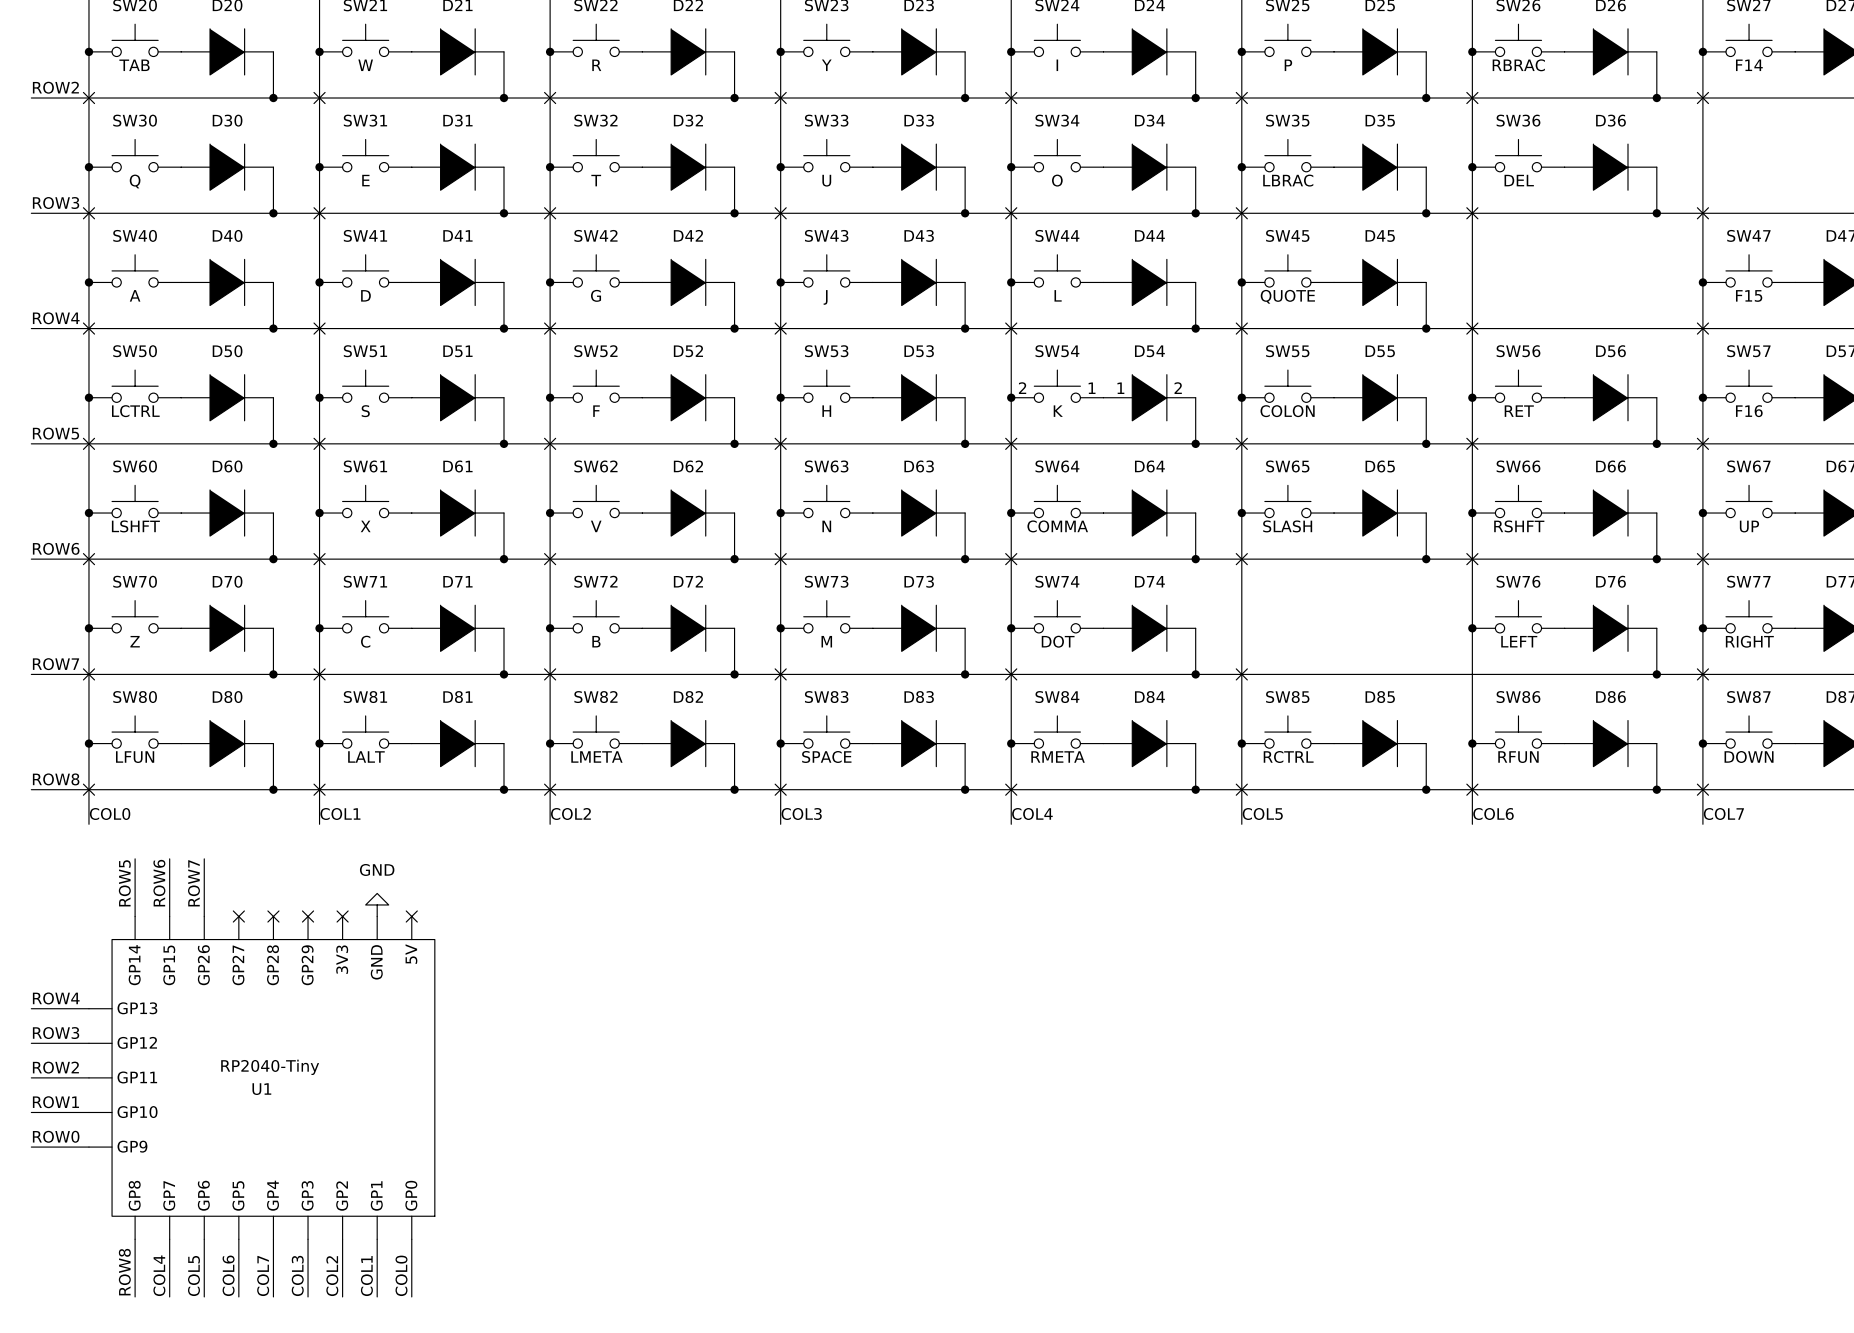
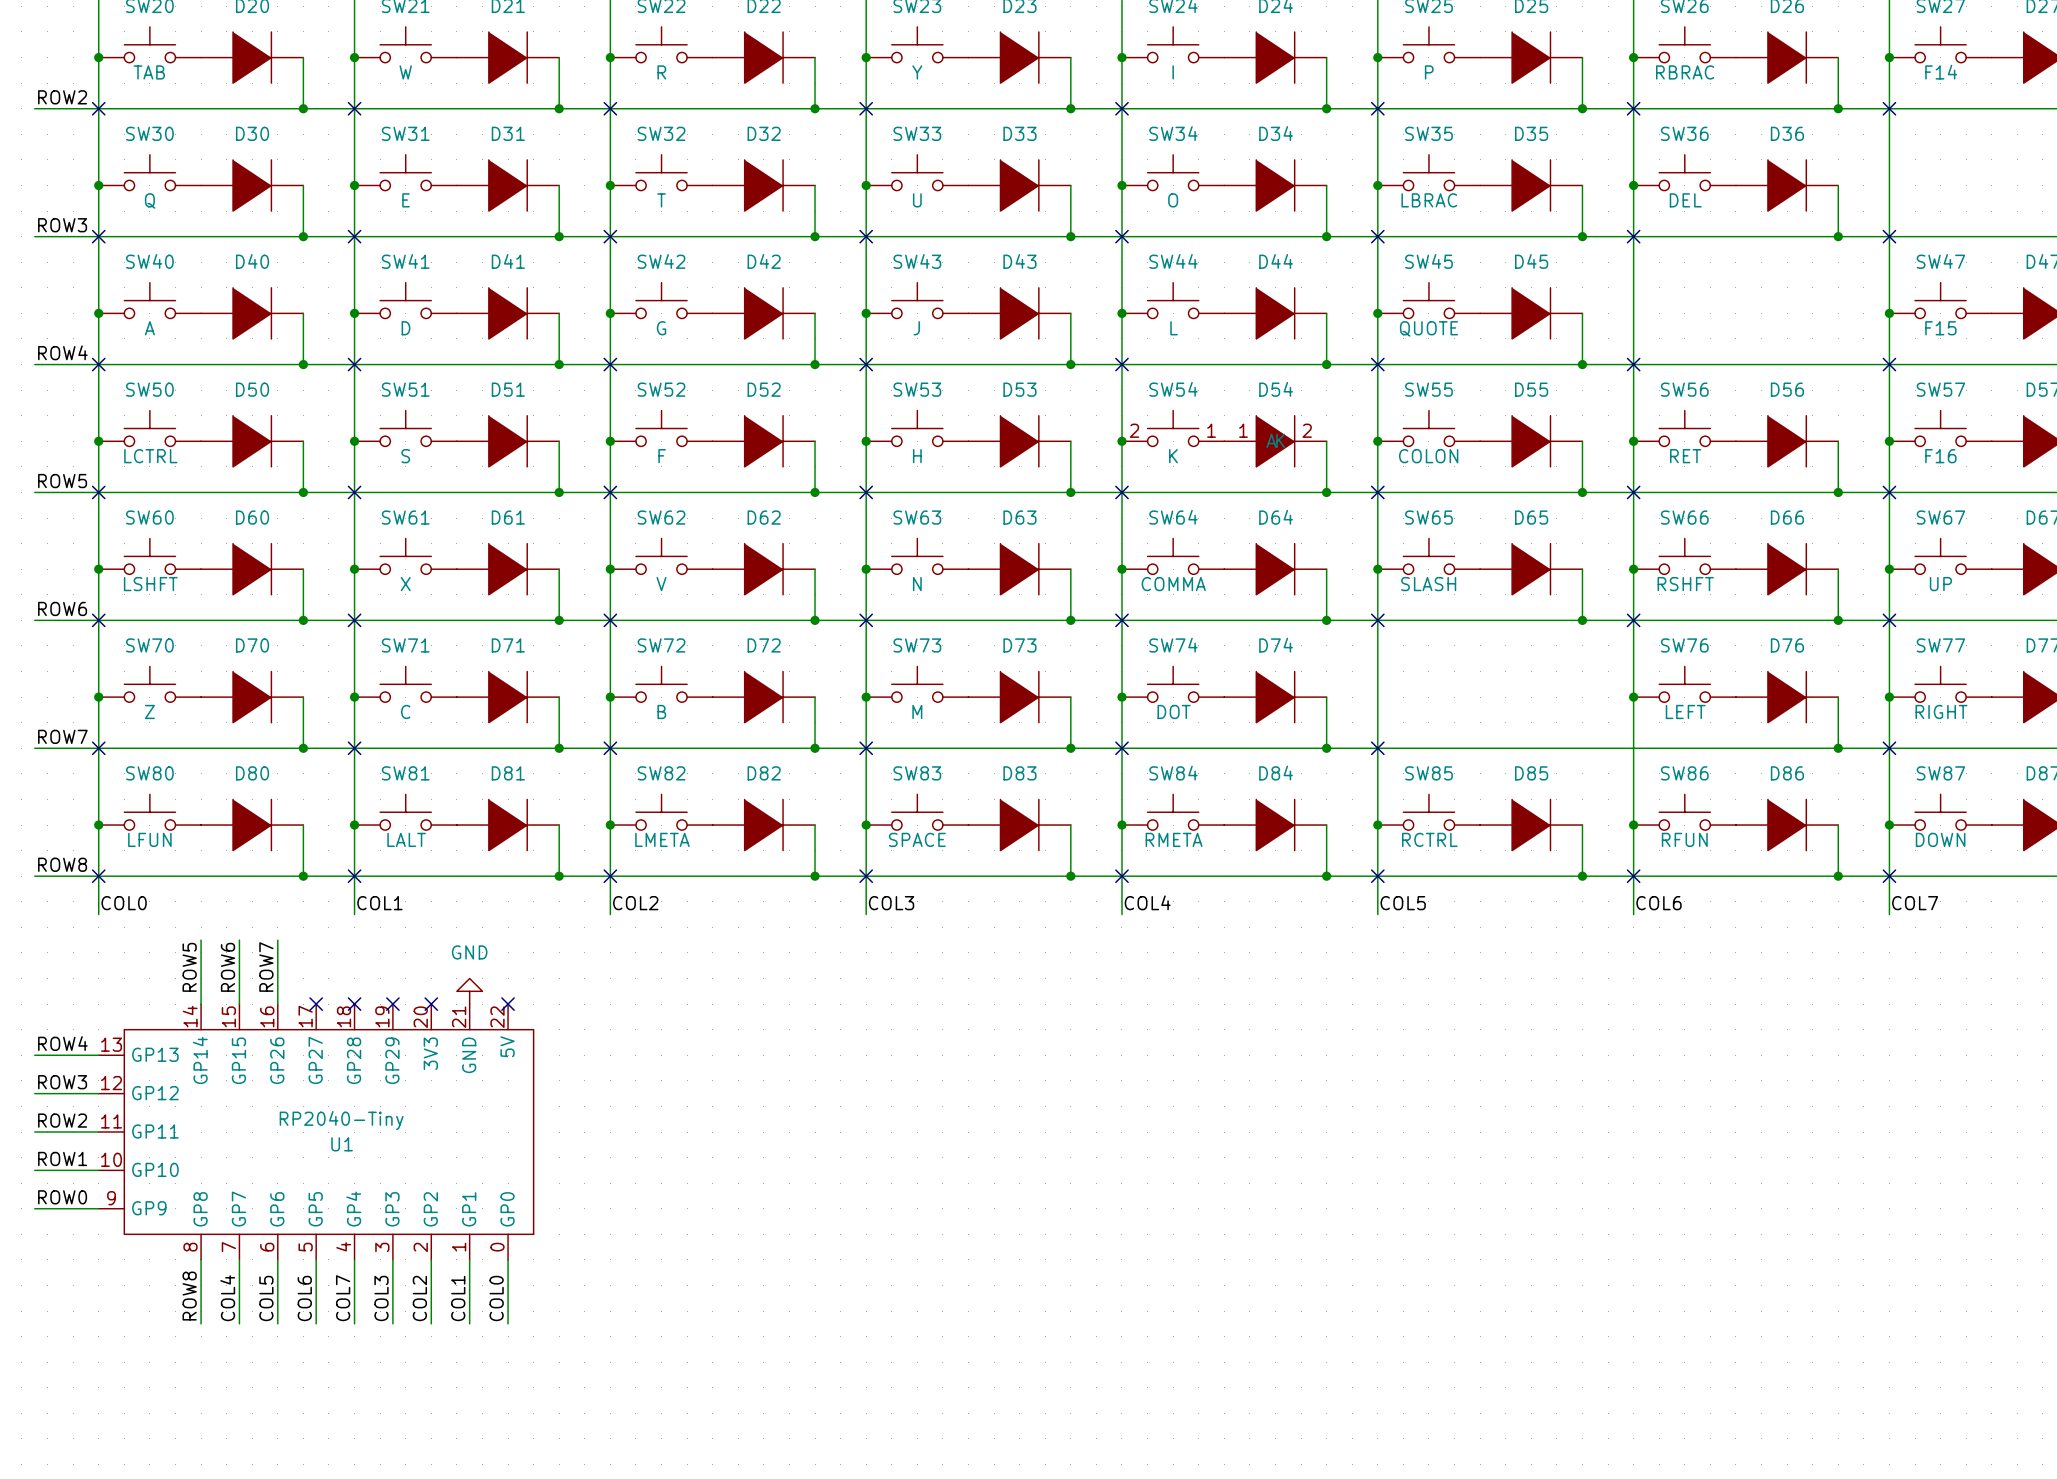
wire: (135, 858) (135, 916) -> (201, 940) (201, 1004)
wire: (169, 858) (169, 916) -> (239, 940) (239, 1004)
wire: (204, 858) (204, 916) -> (277, 940) (277, 1004)
label position: ROW5 (124, 883) -> ROW5 (189, 967)
label position: ROW6 (159, 883) -> ROW6 (228, 967)
label position: ROW7 (193, 883) -> ROW7 (266, 967)
no-connect mark: none -> (316, 1004)
no-connect mark: none -> (354, 1004)
no-connect mark: none -> (392, 1004)
power symbol position: GND (377, 904) -> GND (469, 991)
no-connect mark: none -> (431, 1004)
no-connect mark: none -> (508, 1004)
U1 symbol: [88, 916, 435, 1240] -> [98, 1004, 534, 1260]
no-connect mark: (238, 916) -> none
no-connect mark: (273, 916) -> none
no-connect mark: (308, 916) -> none
no-connect mark: (342, 916) -> none
no-connect mark: (411, 916) -> none
label position: ROW4 (56, 998) -> ROW4 (62, 1043)
wire: (31, 1008) (88, 1008) -> (34, 1055) (98, 1055)
label position: ROW3 (56, 1033) -> ROW3 (62, 1082)
wire: (31, 1043) (88, 1043) -> (34, 1093) (98, 1093)
label position: ROW2 (55, 1067) -> ROW2 (62, 1120)
U1 value position: RP2040-Tiny (270, 1067) -> RP2040-Tiny (341, 1120)
wire: (31, 1077) (88, 1077) -> (34, 1132) (98, 1132)
U1 name position: U1 (261, 1089) -> U1 (342, 1144)
label position: ROW1 (55, 1102) -> ROW1 (62, 1158)
wire: (31, 1112) (88, 1112) -> (34, 1170) (98, 1170)
label position: ROW0 (56, 1136) -> ROW0 (62, 1197)
wire: (31, 1147) (88, 1147) -> (34, 1208) (98, 1208)
wire: (135, 1239) (135, 1296) -> (201, 1259) (201, 1323)
wire: (169, 1239) (169, 1296) -> (239, 1259) (239, 1323)
wire: (204, 1239) (204, 1296) -> (277, 1259) (277, 1323)
wire: (238, 1239) (238, 1296) -> (316, 1259) (316, 1323)
wire: (273, 1239) (273, 1296) -> (354, 1259) (354, 1323)
wire: (308, 1239) (308, 1296) -> (392, 1259) (392, 1323)
wire: (342, 1239) (342, 1296) -> (431, 1259) (431, 1323)
wire: (377, 1239) (377, 1296) -> (469, 1259) (469, 1323)
wire: (411, 1239) (411, 1296) -> (508, 1259) (508, 1323)
label position: ROW8 (124, 1272) -> ROW8 (189, 1296)
label position: COL4 (159, 1275) -> COL4 (227, 1298)
label position: COL6 (228, 1275) -> COL6 (304, 1298)
label position: COL7 (263, 1275) -> COL7 (343, 1298)
label position: COL3 (297, 1275) -> COL3 (381, 1298)
label position: COL0 (401, 1275) -> COL0 (496, 1298)
label position: COL5 (193, 1276) -> COL5 (266, 1298)
label position: COL2 (332, 1276) -> COL2 (419, 1298)
label position: COL1 (366, 1276) -> COL1 (458, 1298)

